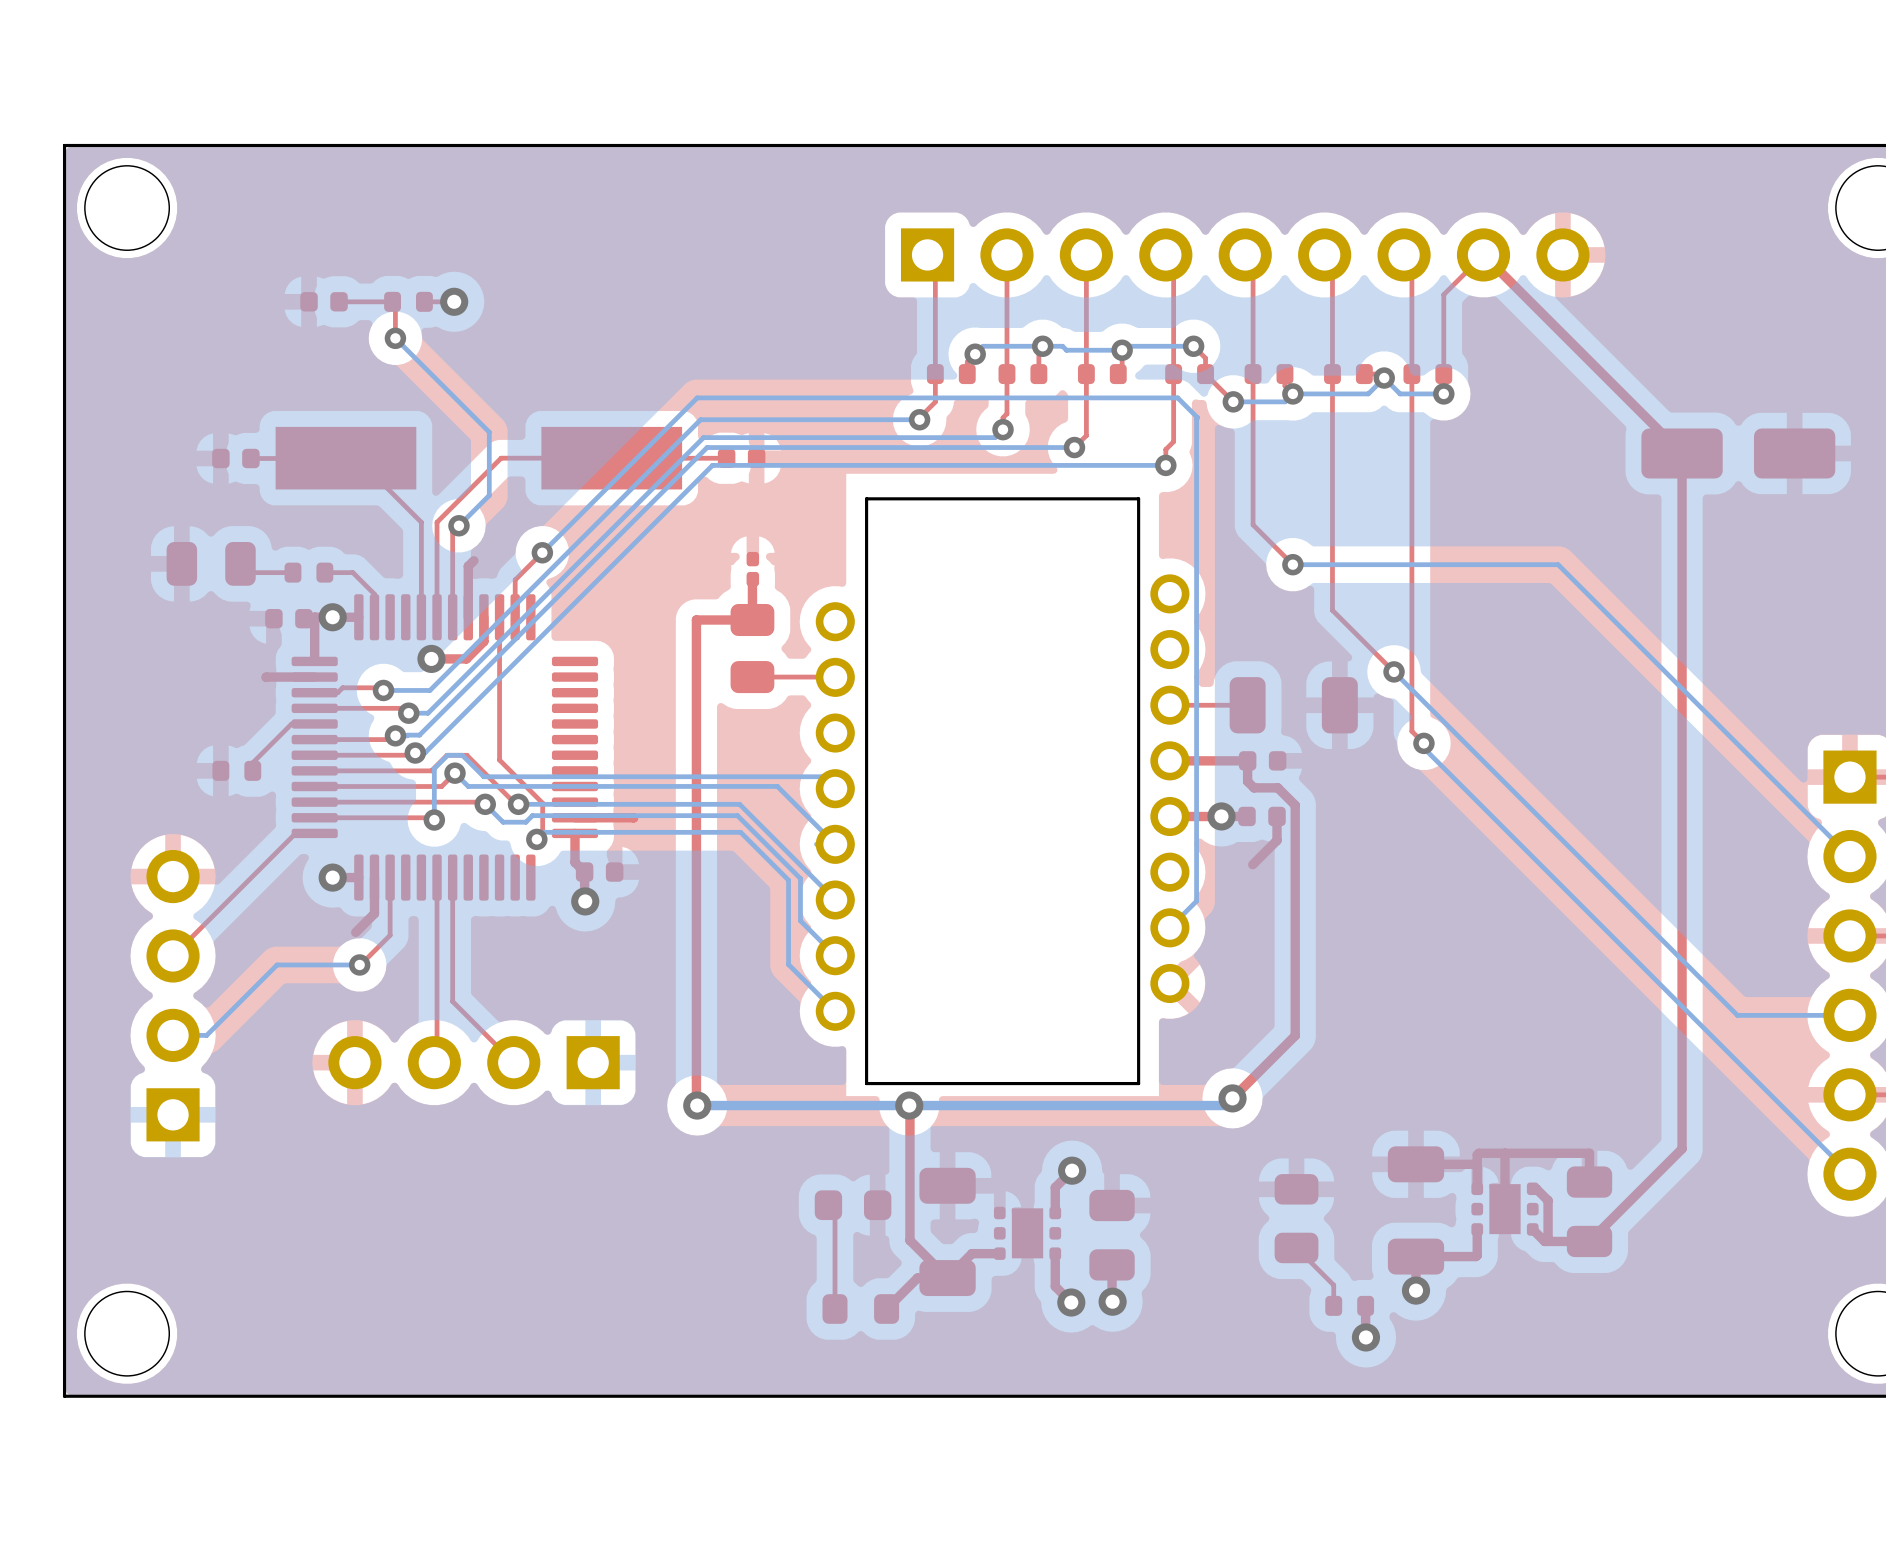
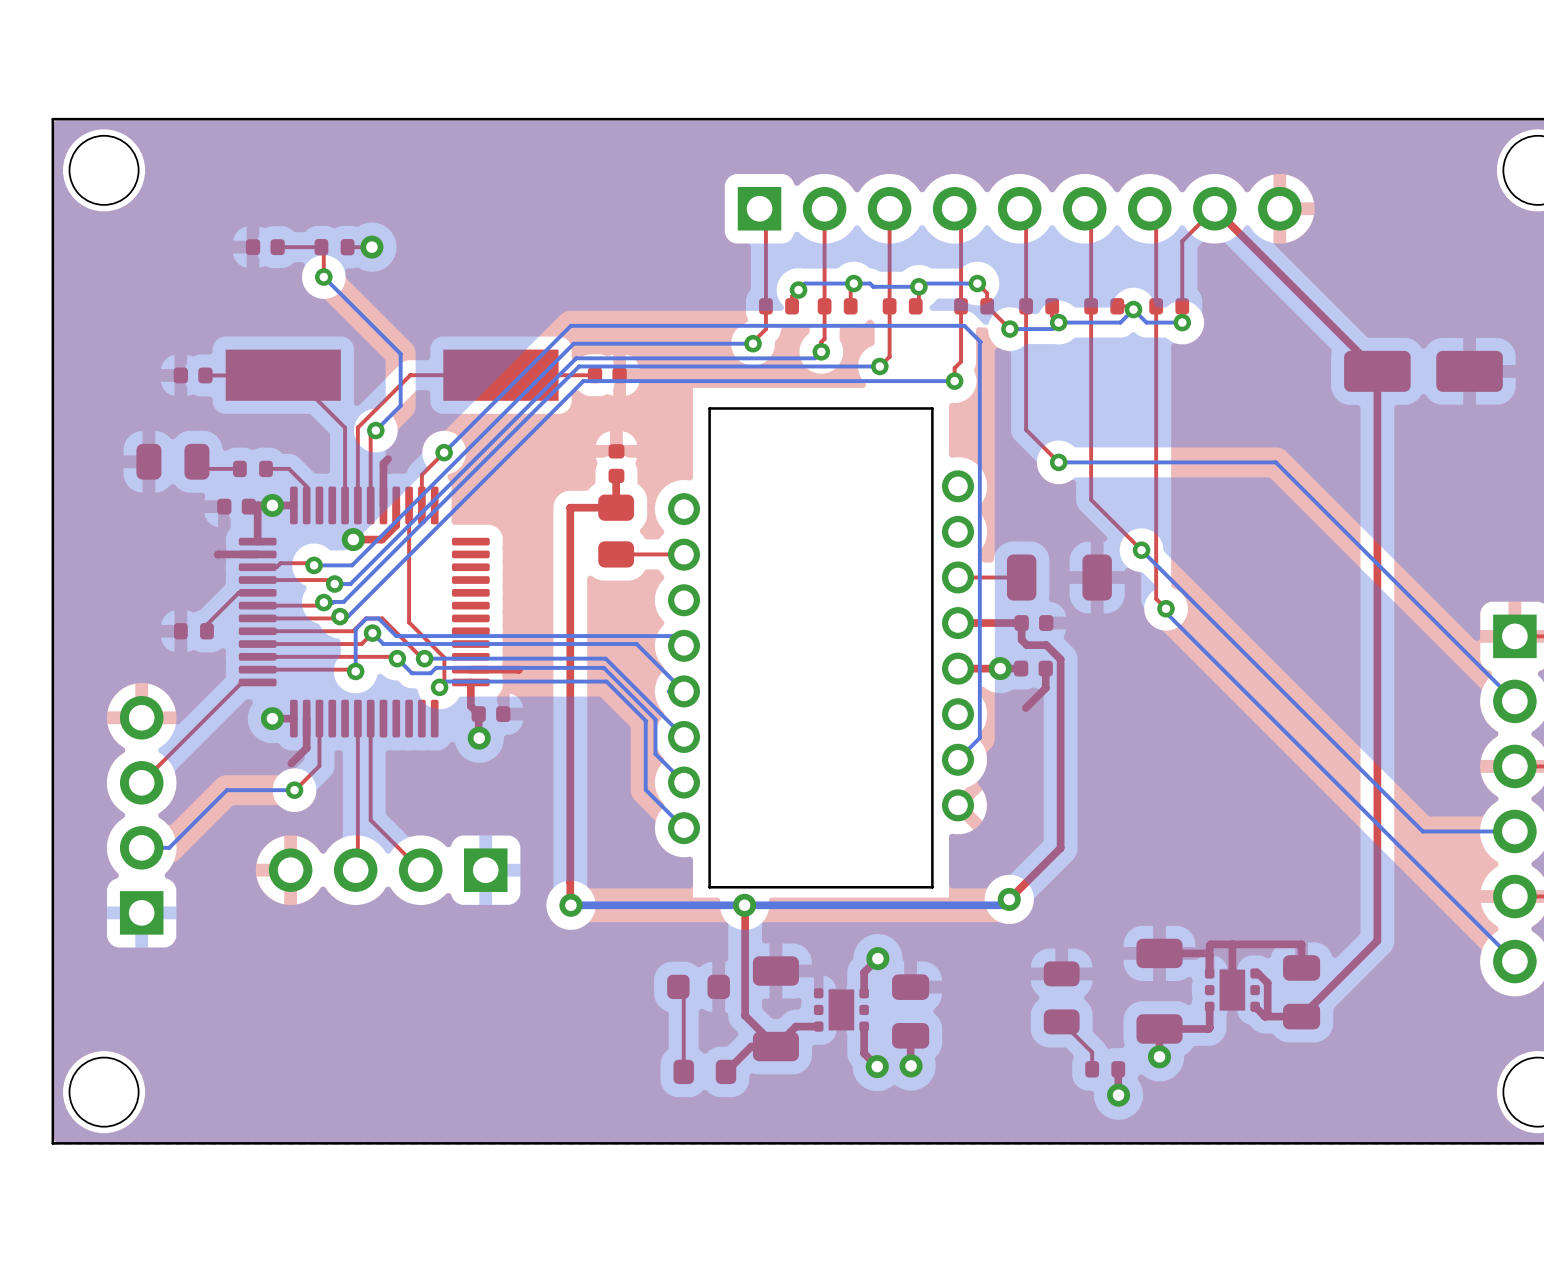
part footprint: [746, 551, 760, 587] -> [608, 444, 625, 484]

